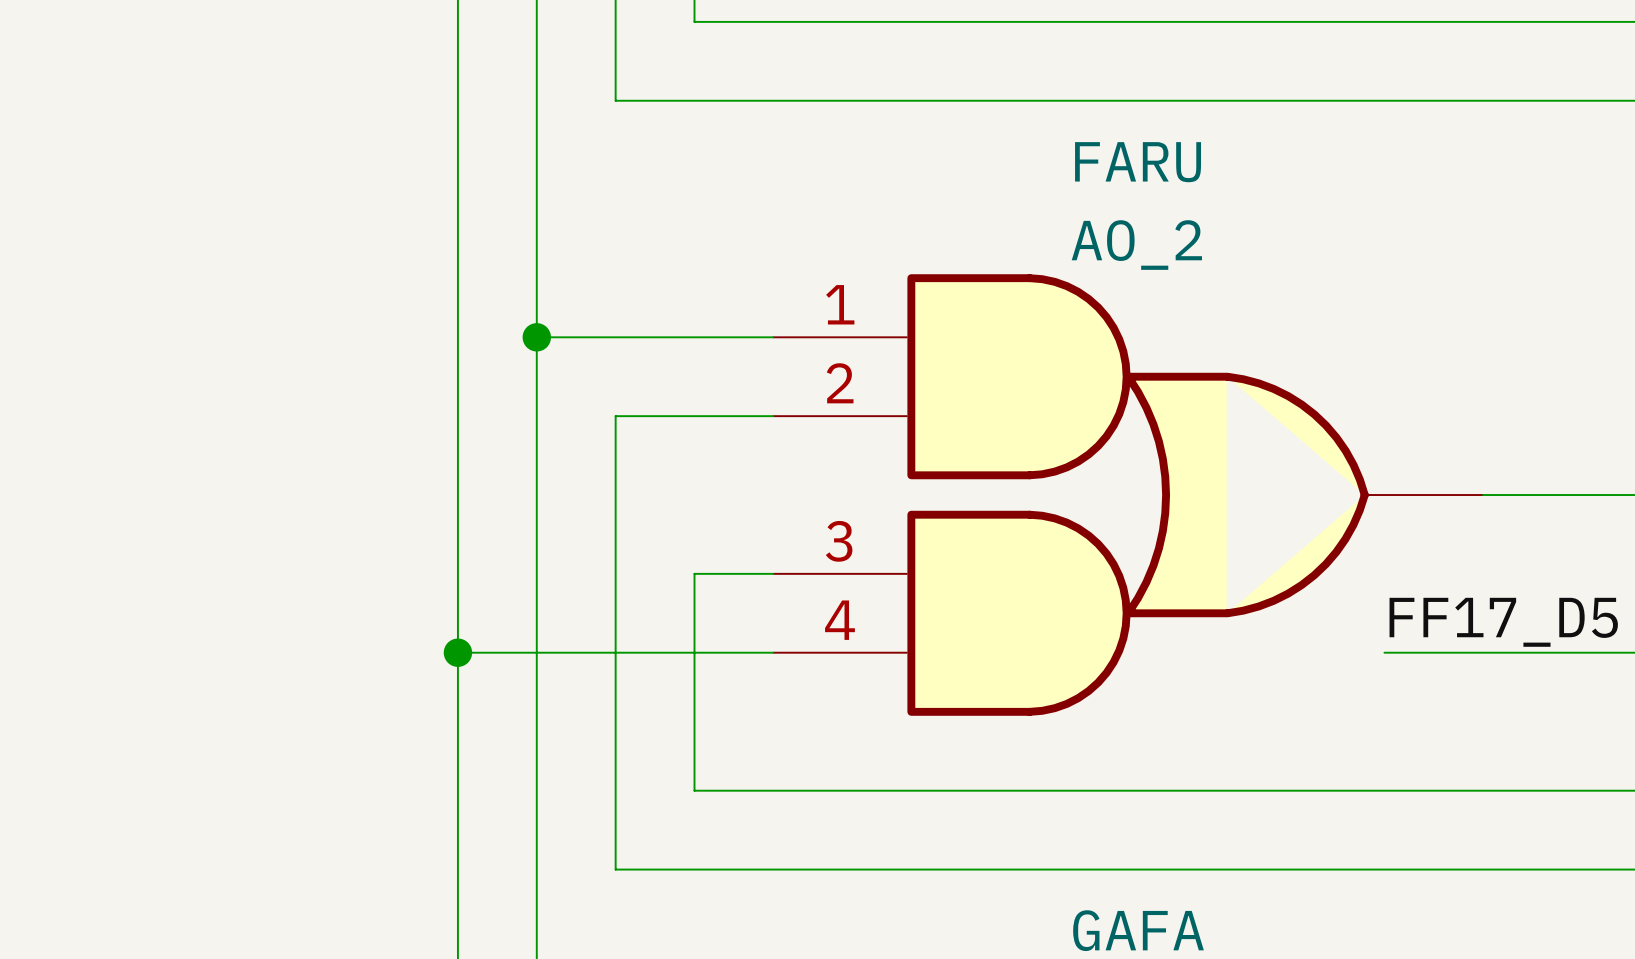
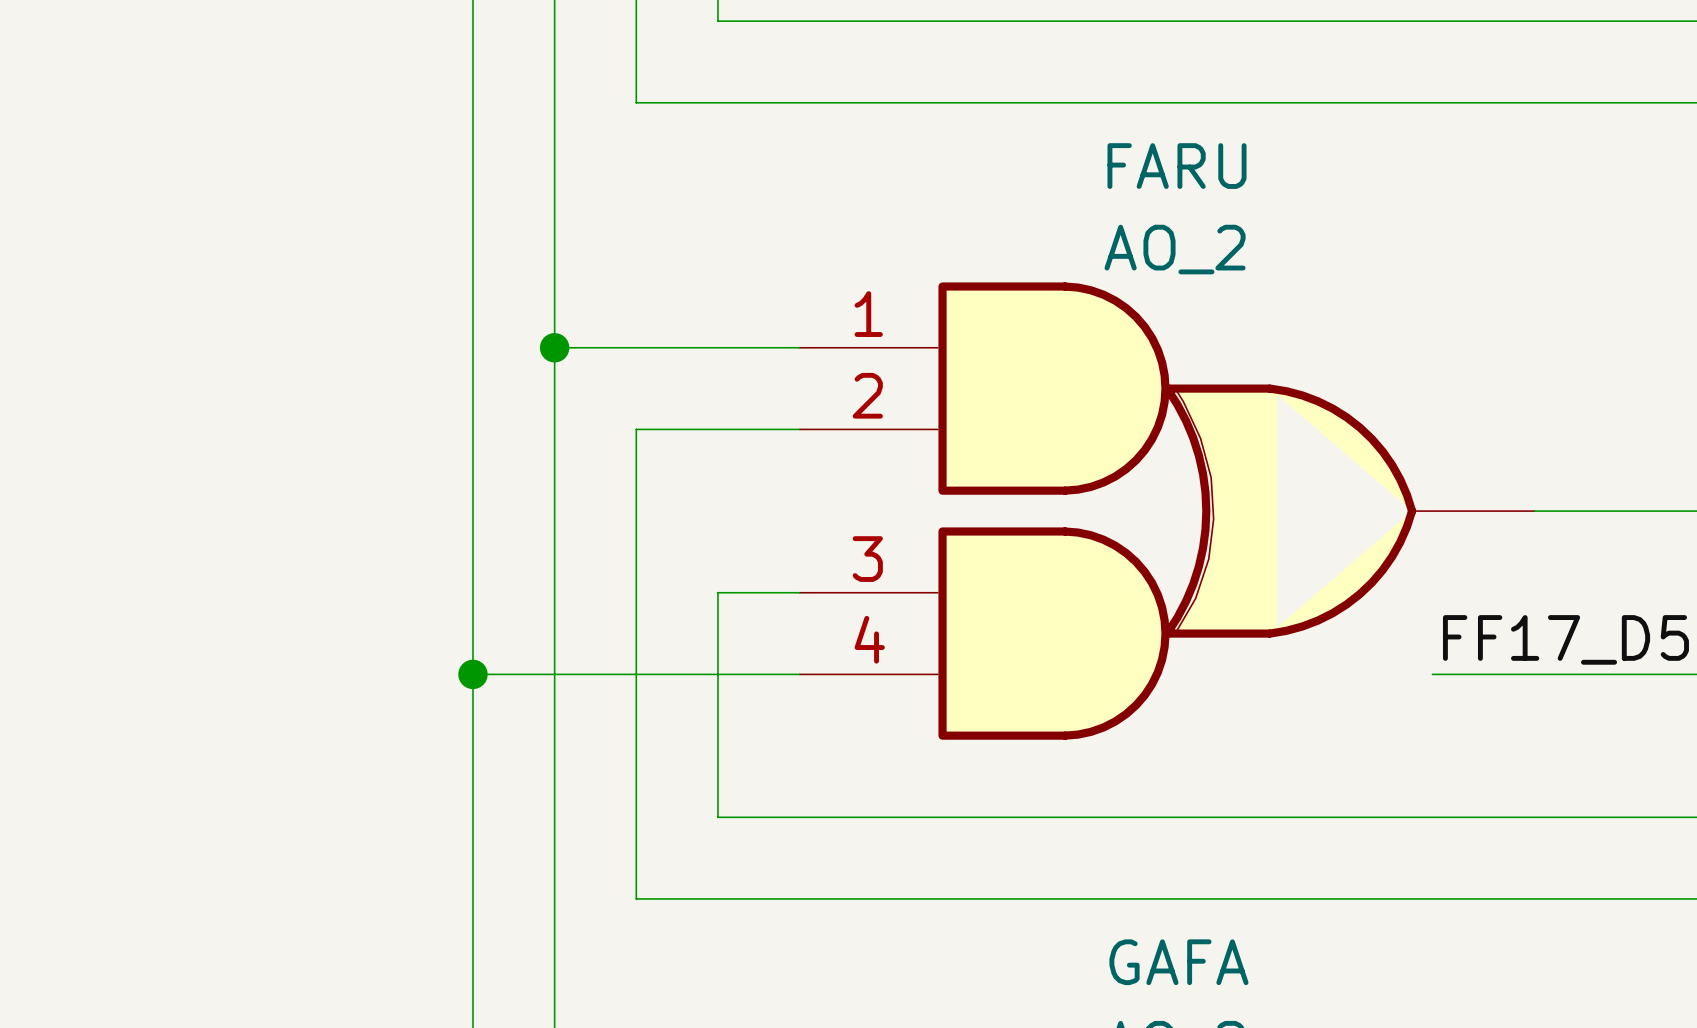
FARU symbol: [773, 274, 1484, 716] -> [799, 282, 1535, 740]

